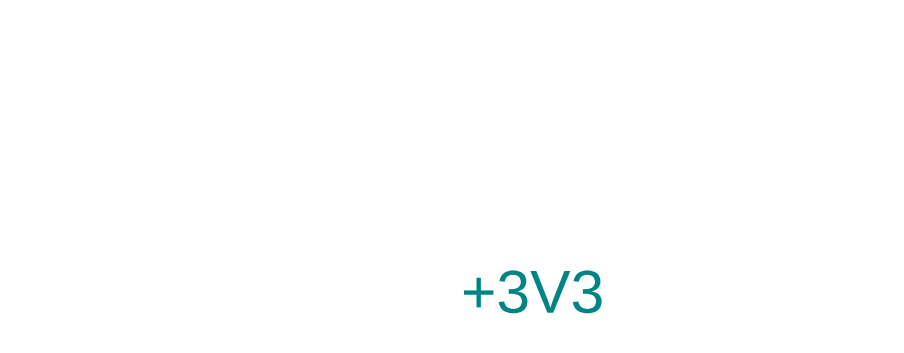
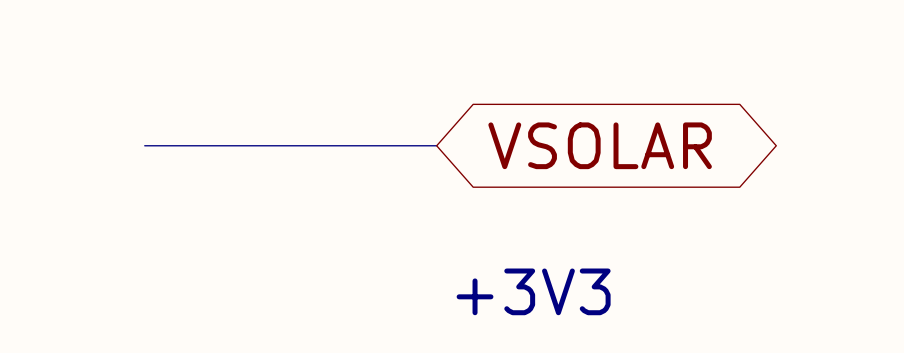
wire: none -> (144, 145) (436, 145)
global label: none -> VSOLAR (600, 145)

